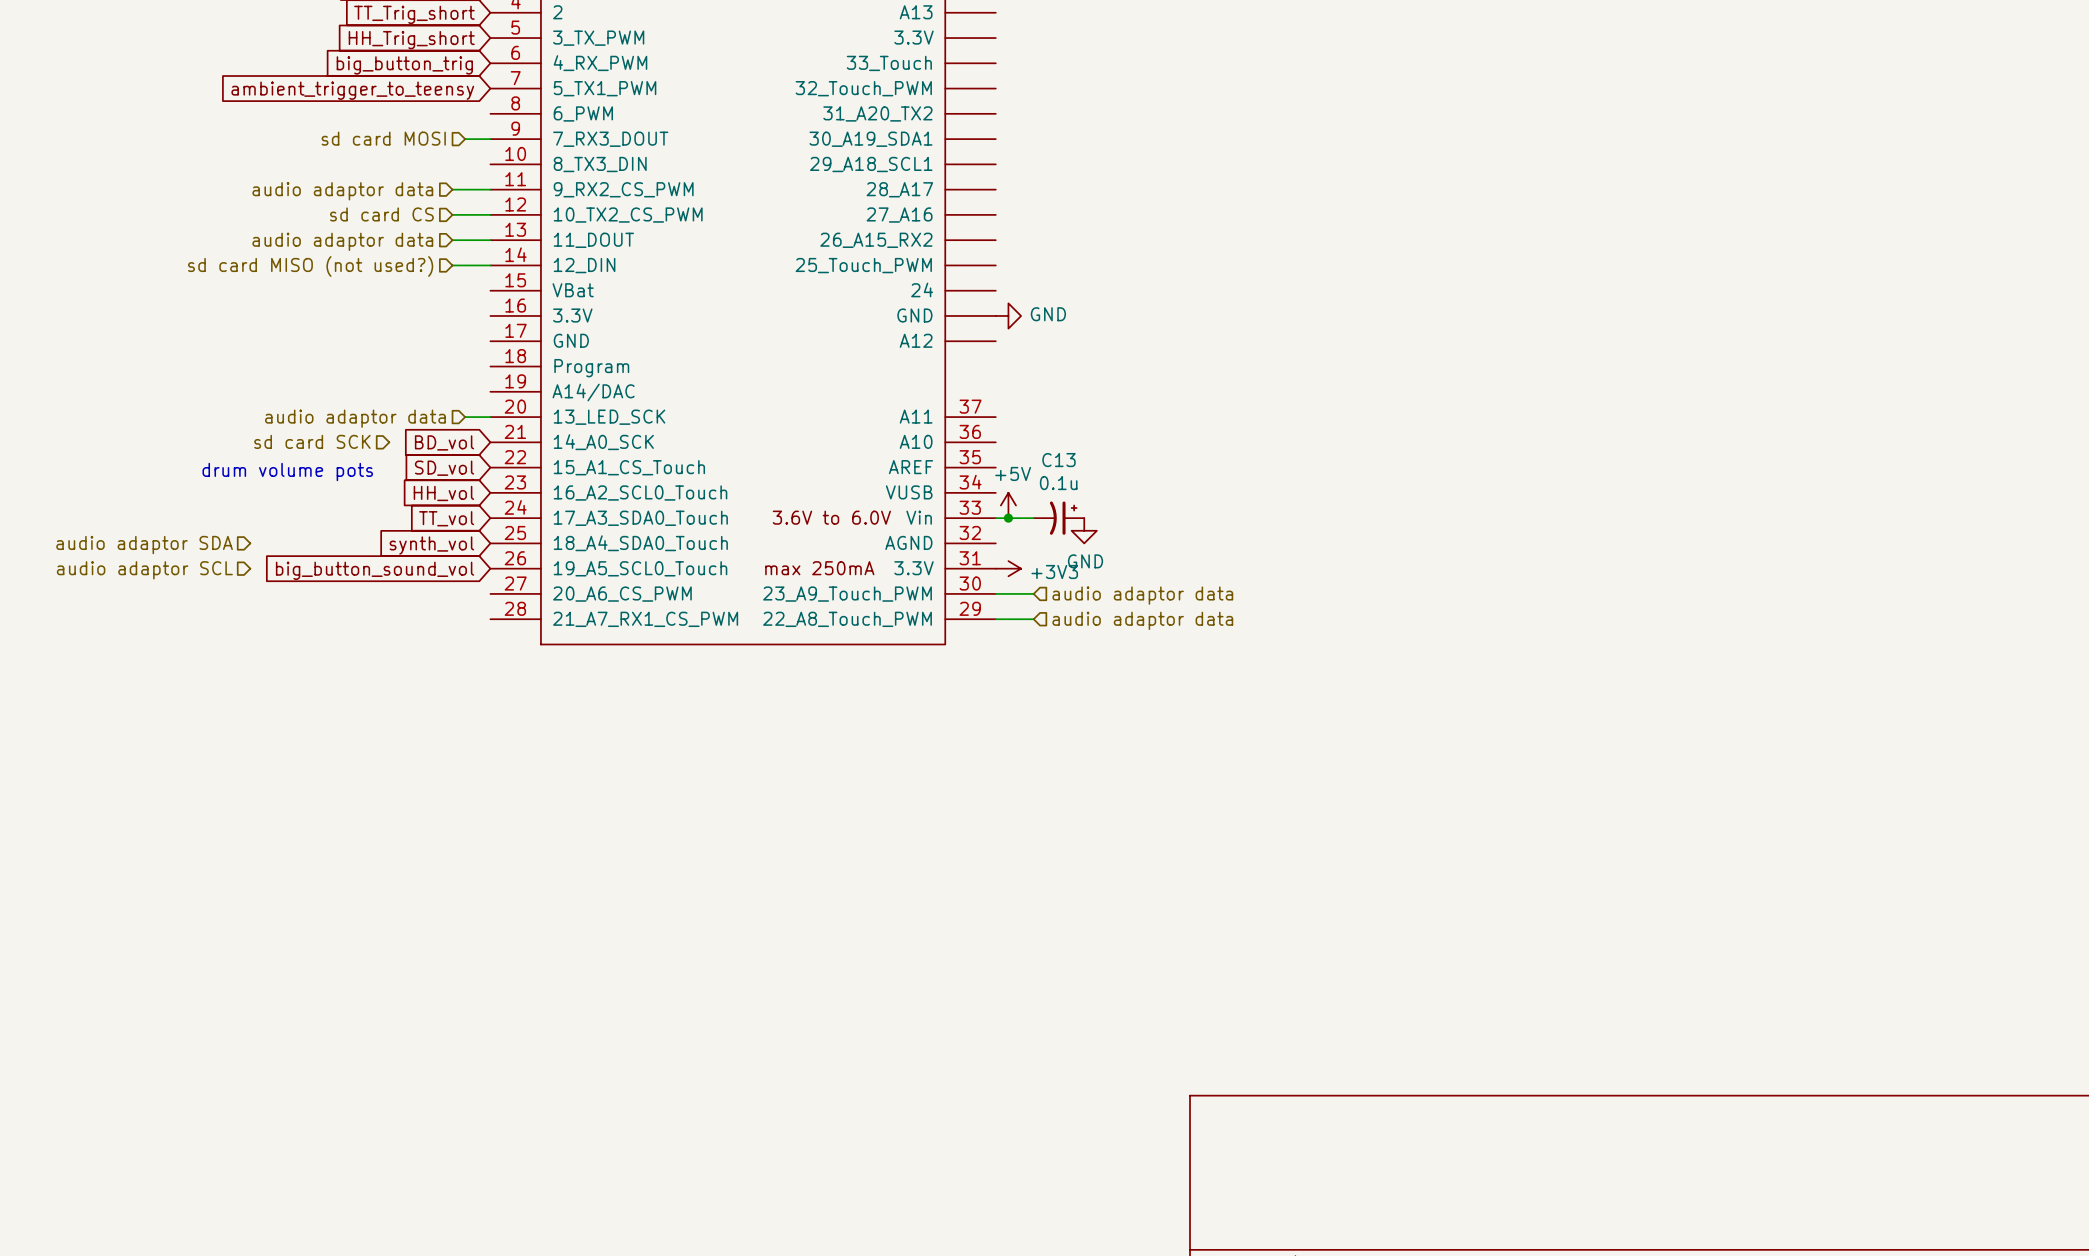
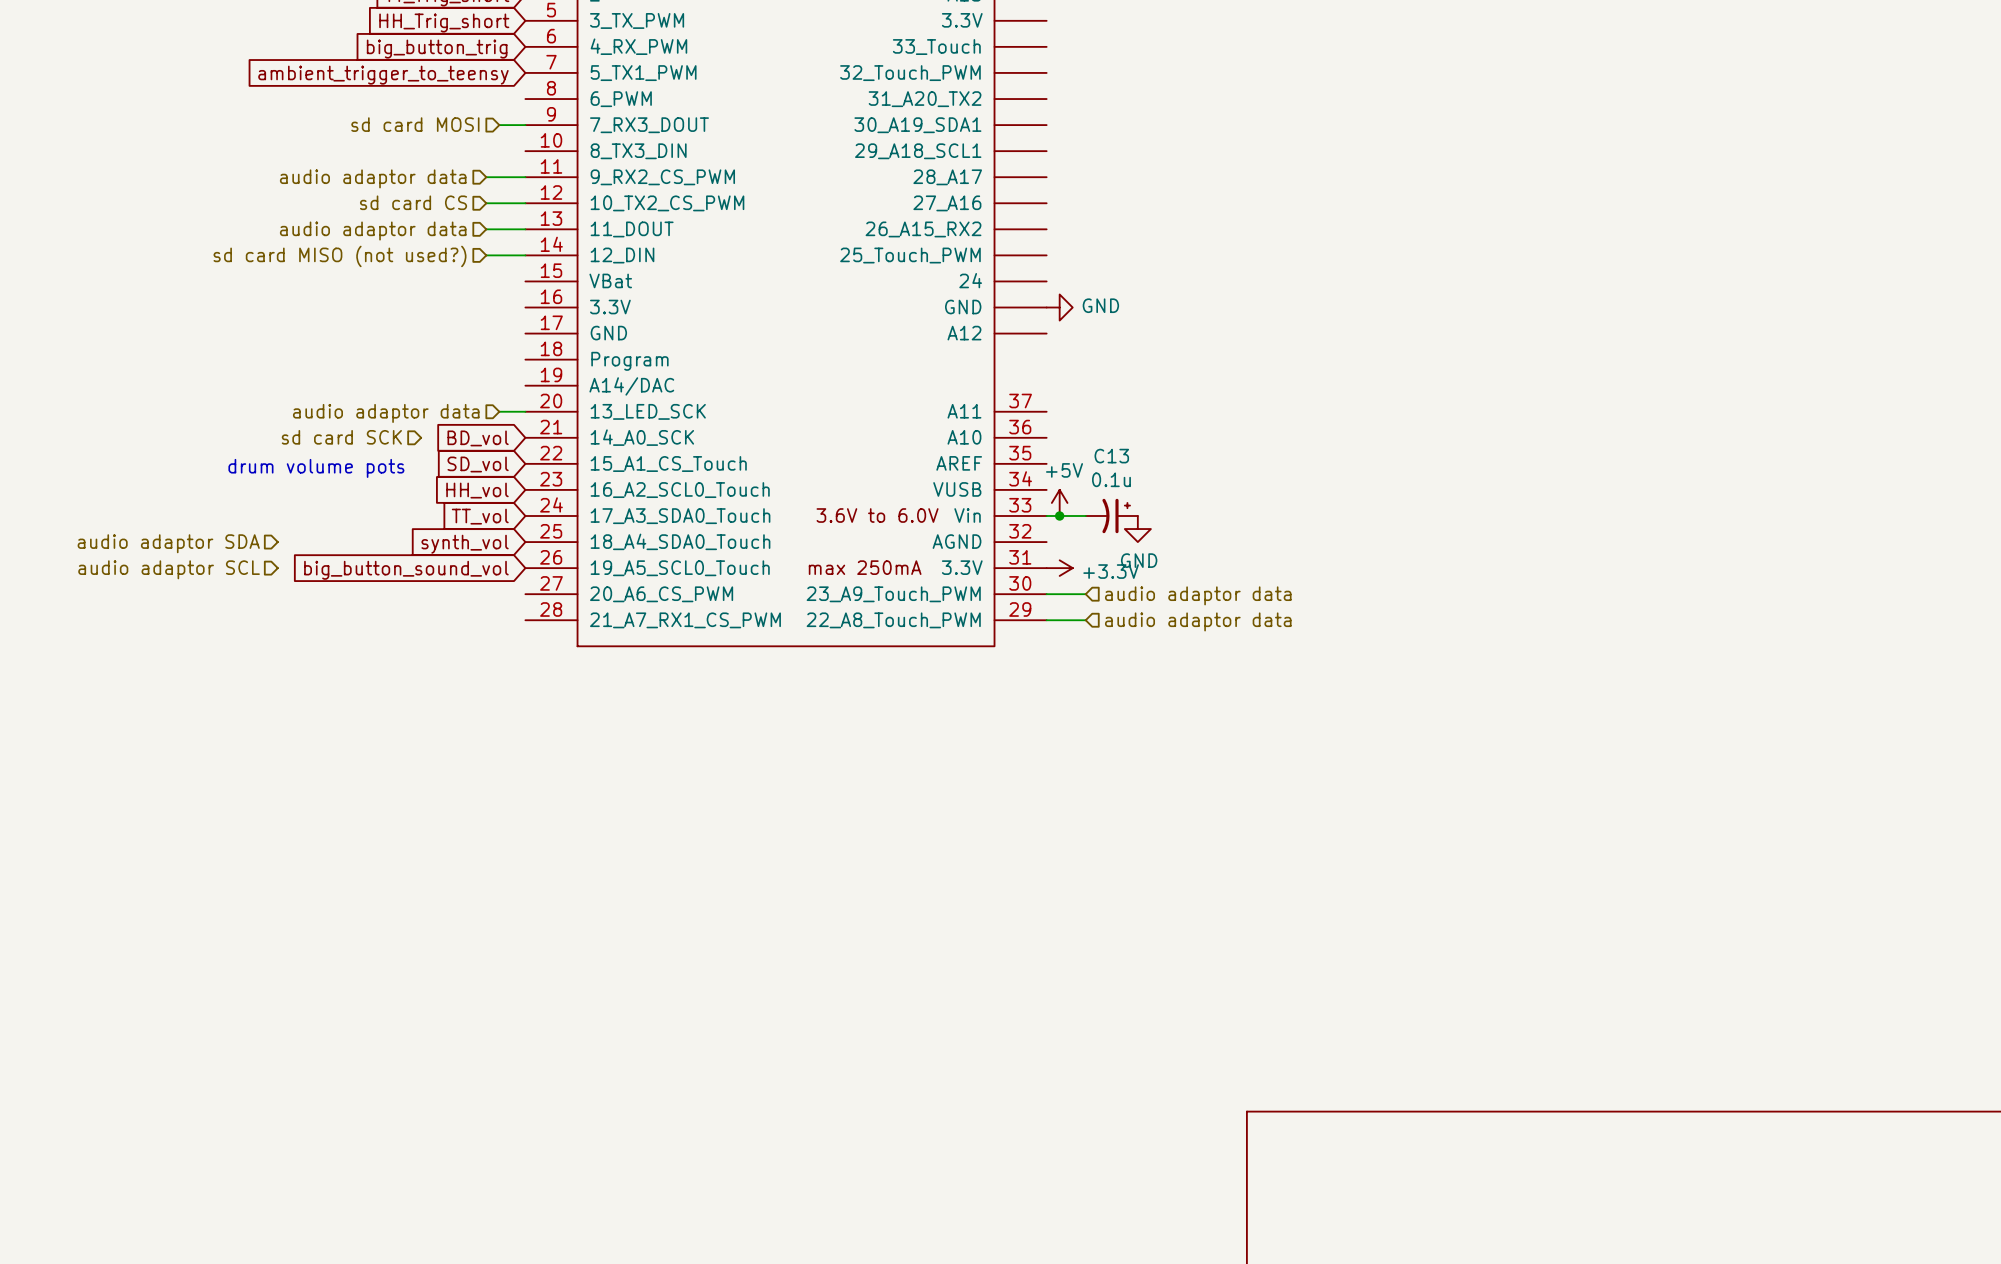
power symbol: +3V3 (1008, 568) -> +3.3V (1059, 568)

